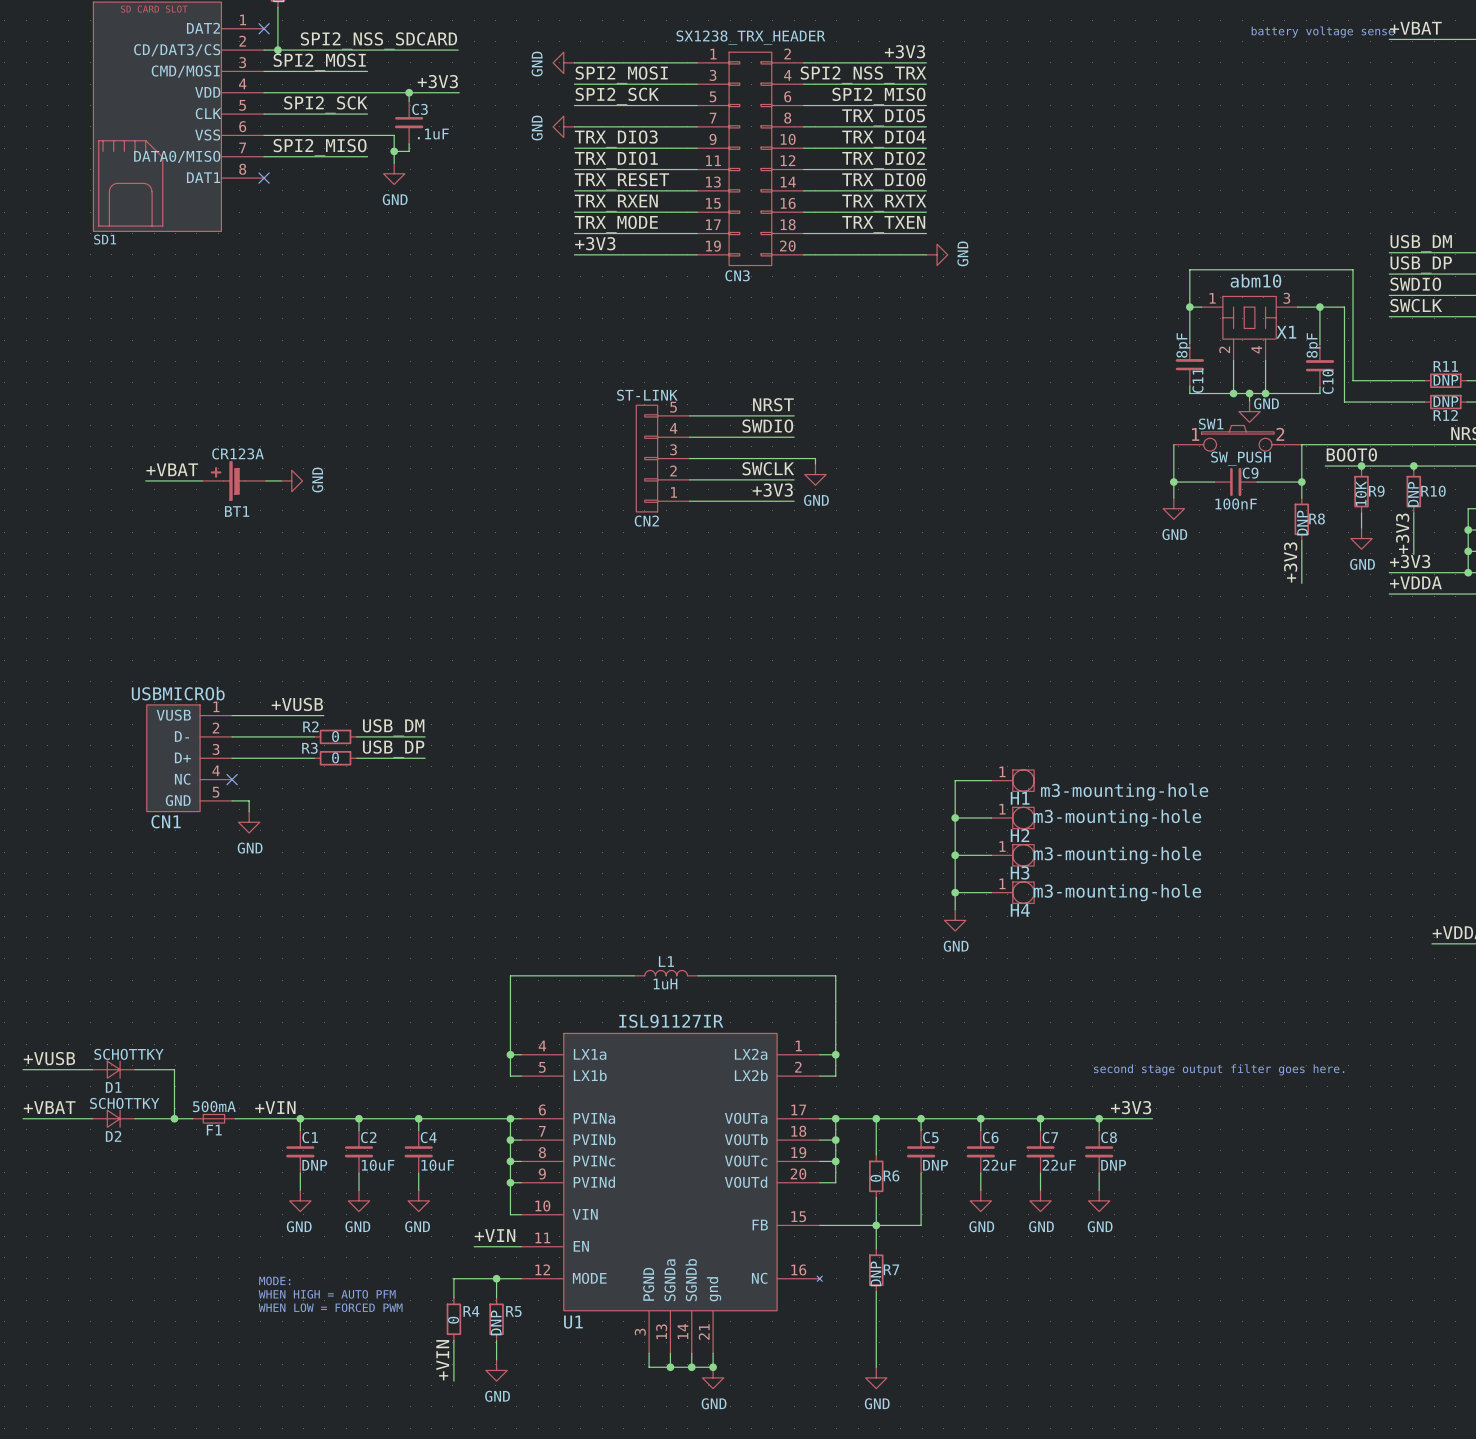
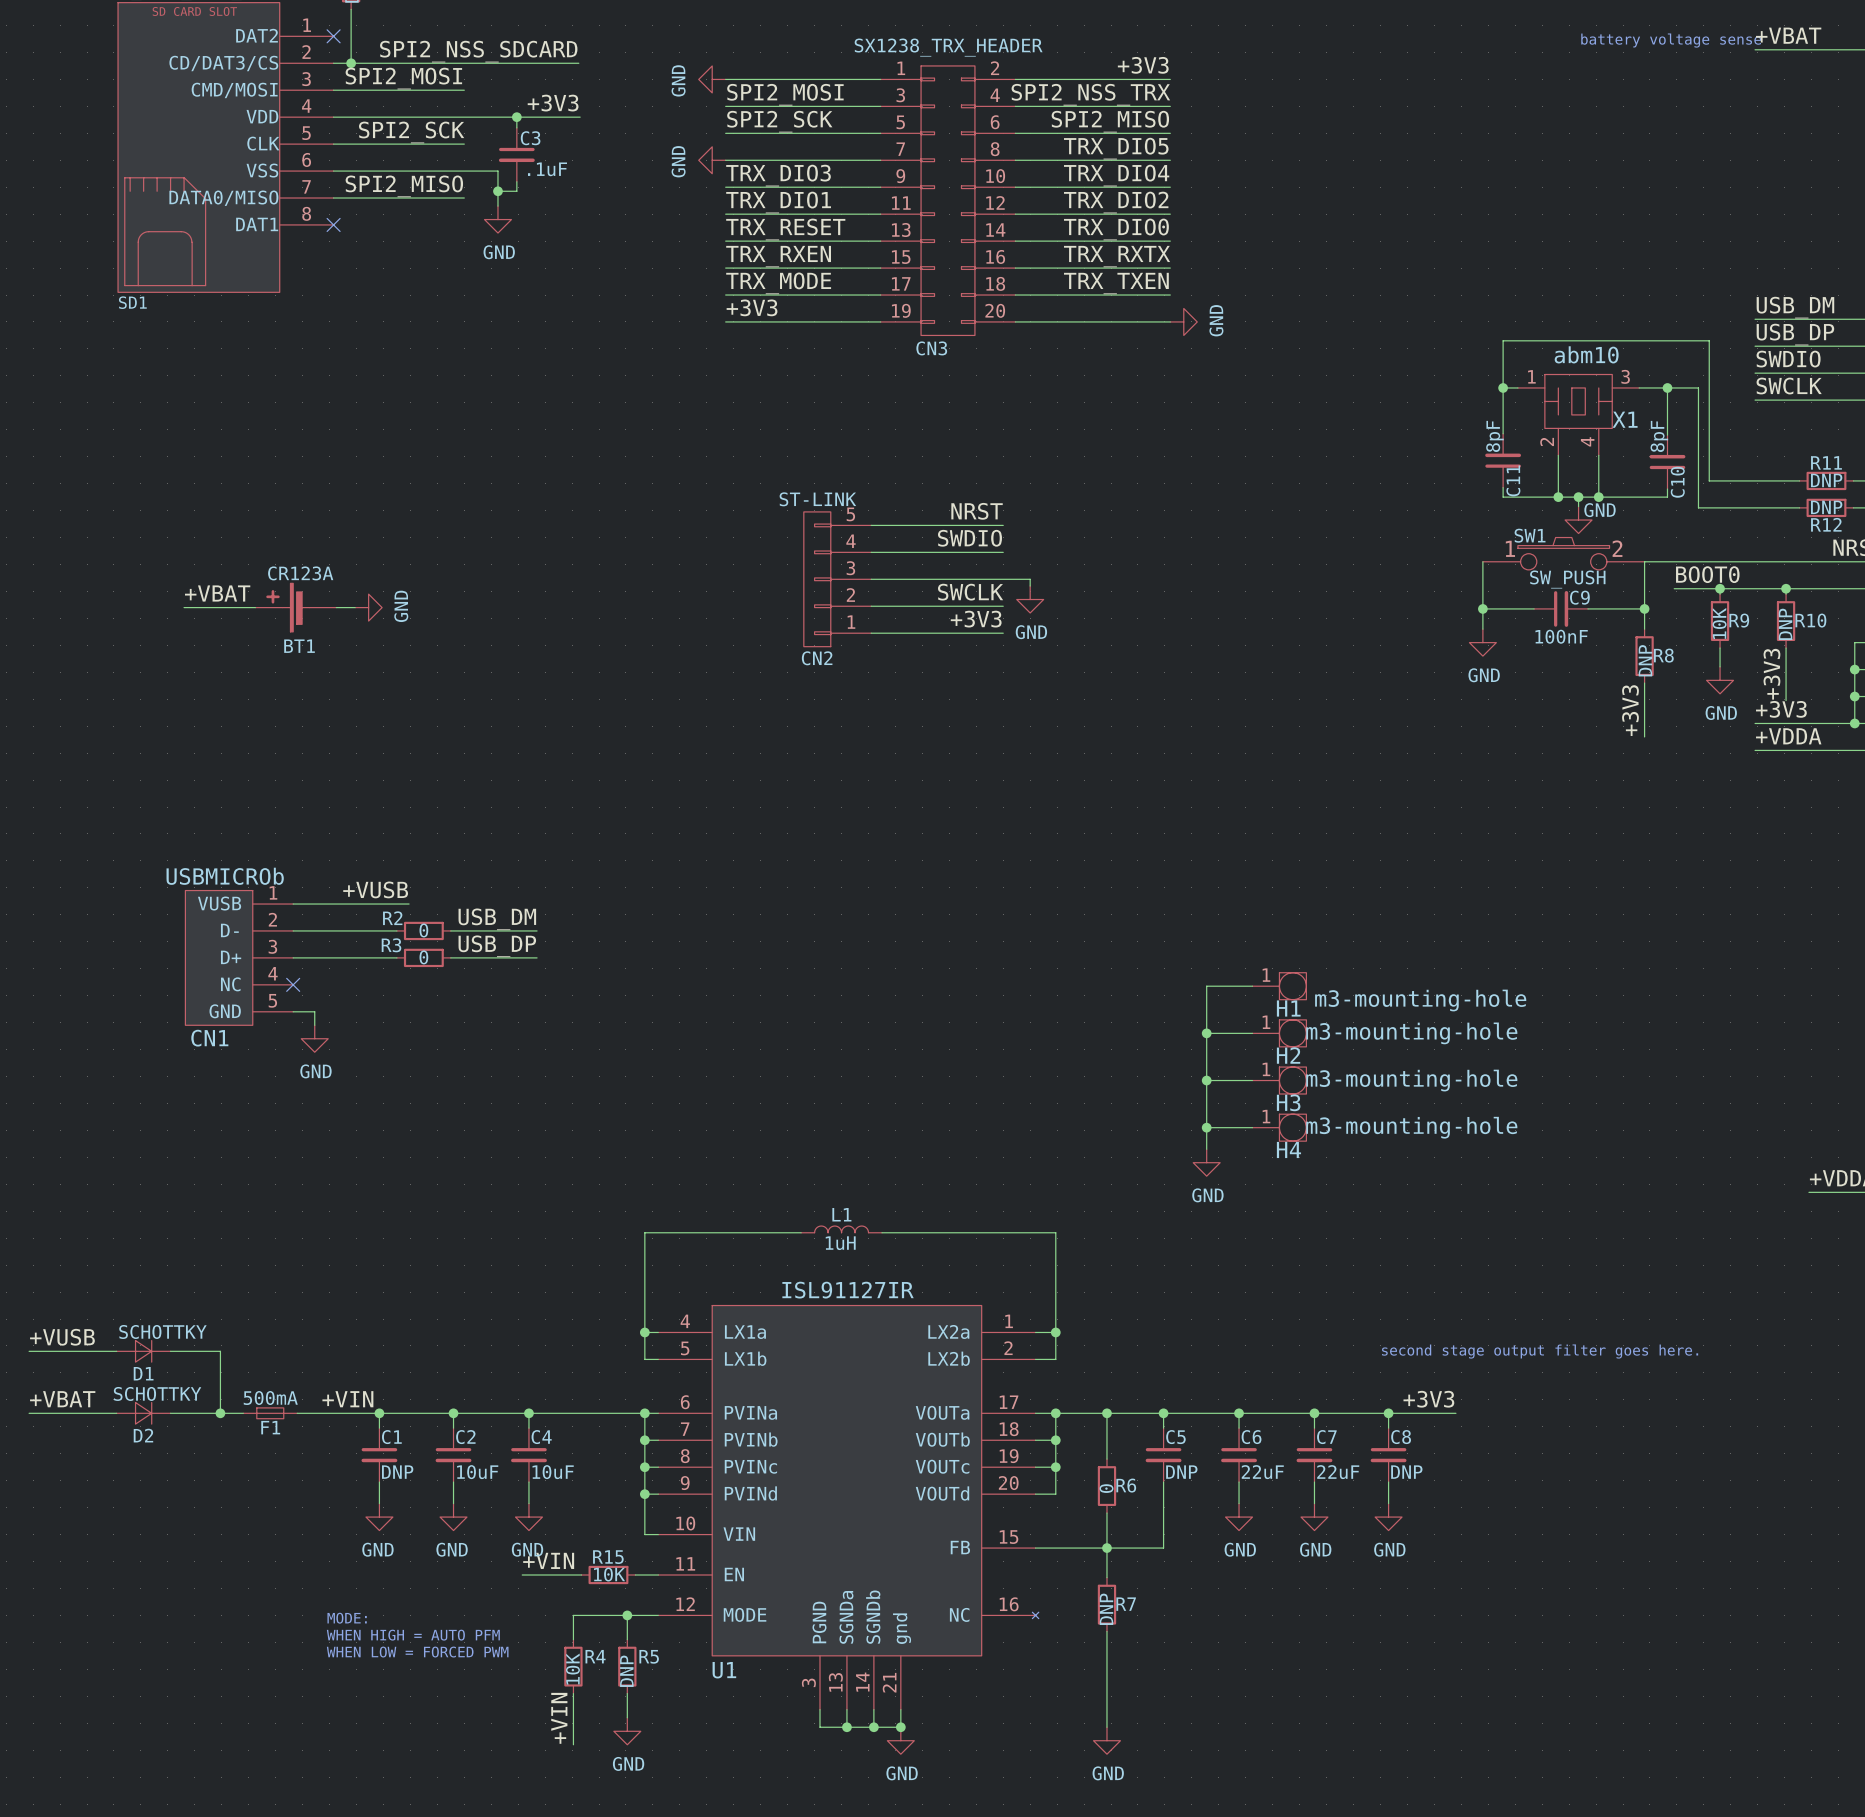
label position: +VIN (495, 1235) -> +VIN (548, 1560)
wire: none -> (522, 1575) (581, 1575)
R15: none -> 10K (608, 1575)
R4 value: 0 (453, 1320) -> 10K (572, 1669)

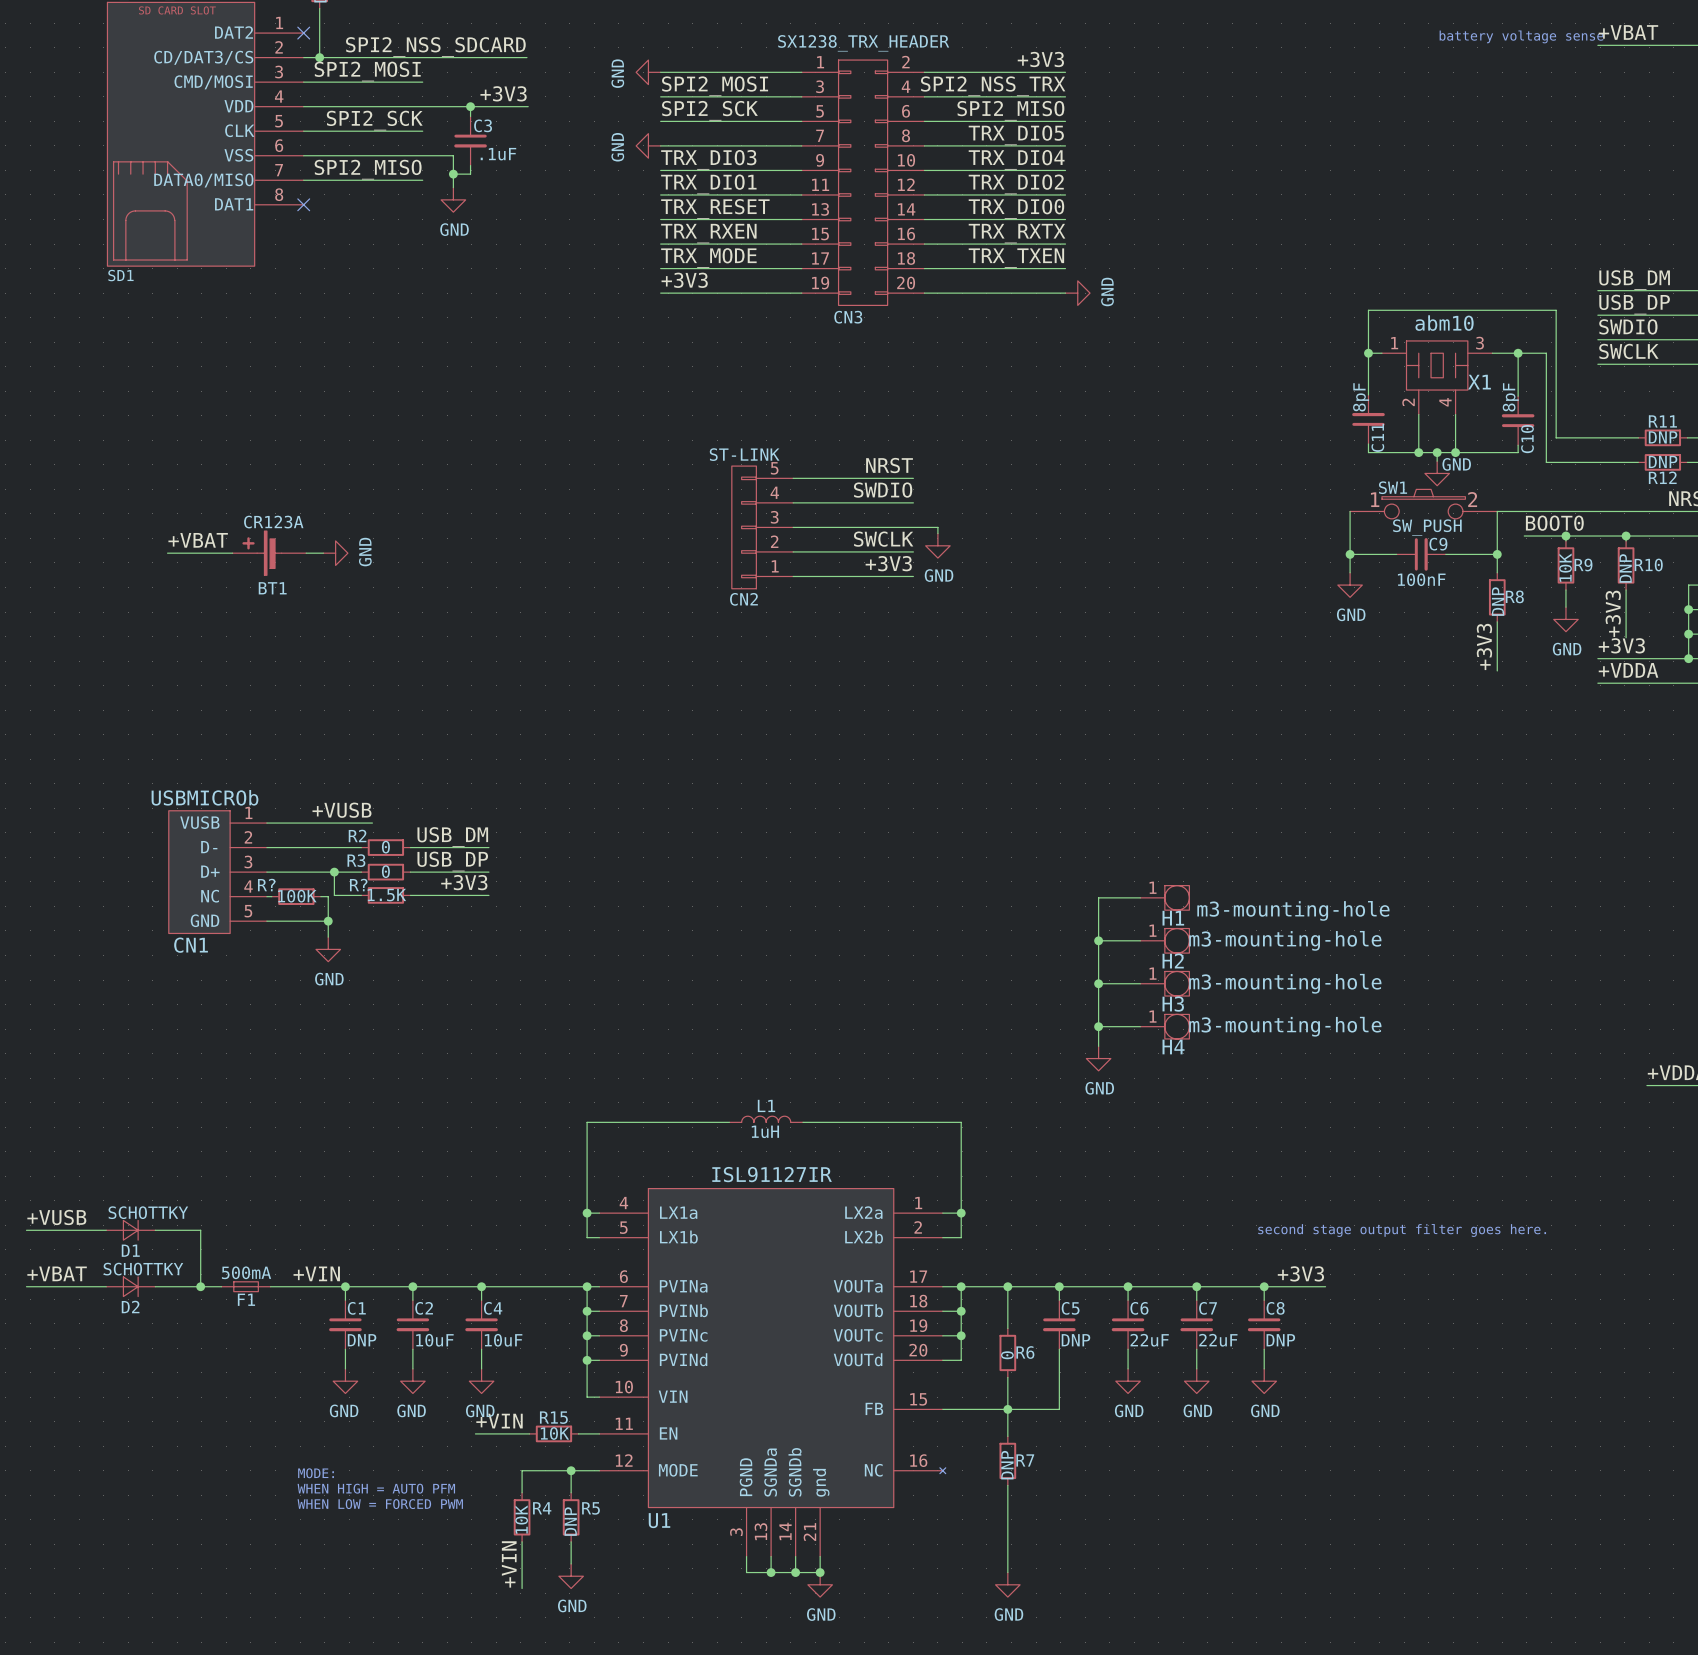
wire: none -> (334, 872) (334, 895) (361, 895)
junction: none -> (334, 872)
label: none -> +3V3 (464, 882)
R?: none -> 1.5K (385, 895)
wire: none -> (410, 895) (488, 895)
wire: none -> (266, 896) (271, 896)
no-connect mark: (293, 984) -> none
R?: none -> 100K (296, 896)
wire: none -> (320, 896) (328, 896) (328, 937)
wire: (314, 1011) (314, 1025) -> (286, 921) (328, 921)
junction: none -> (328, 921)
power symbol position: GND (314, 1038) -> GND (328, 949)

